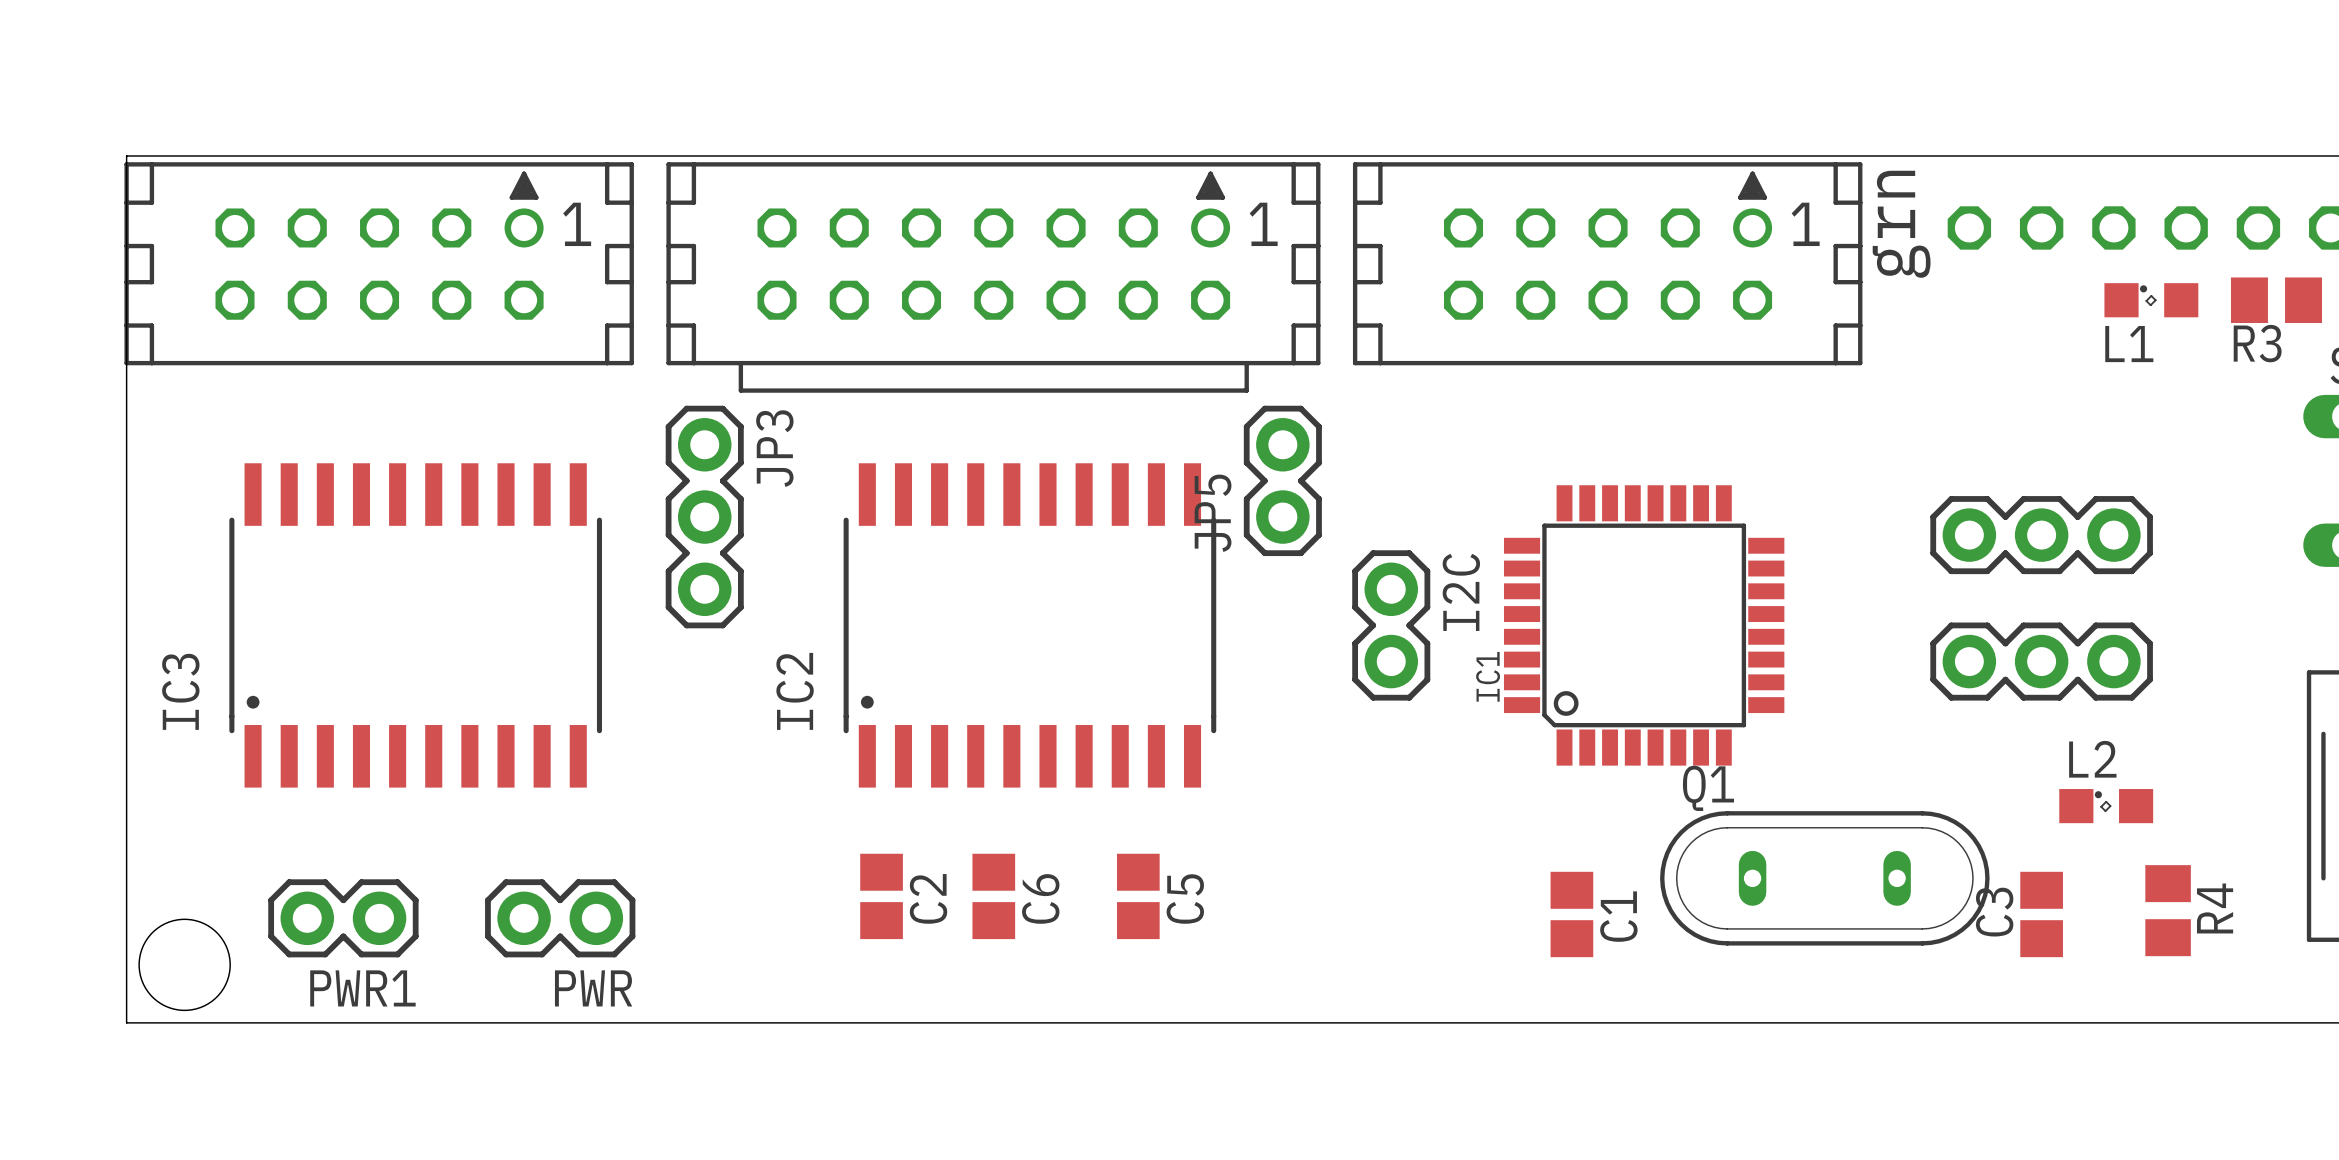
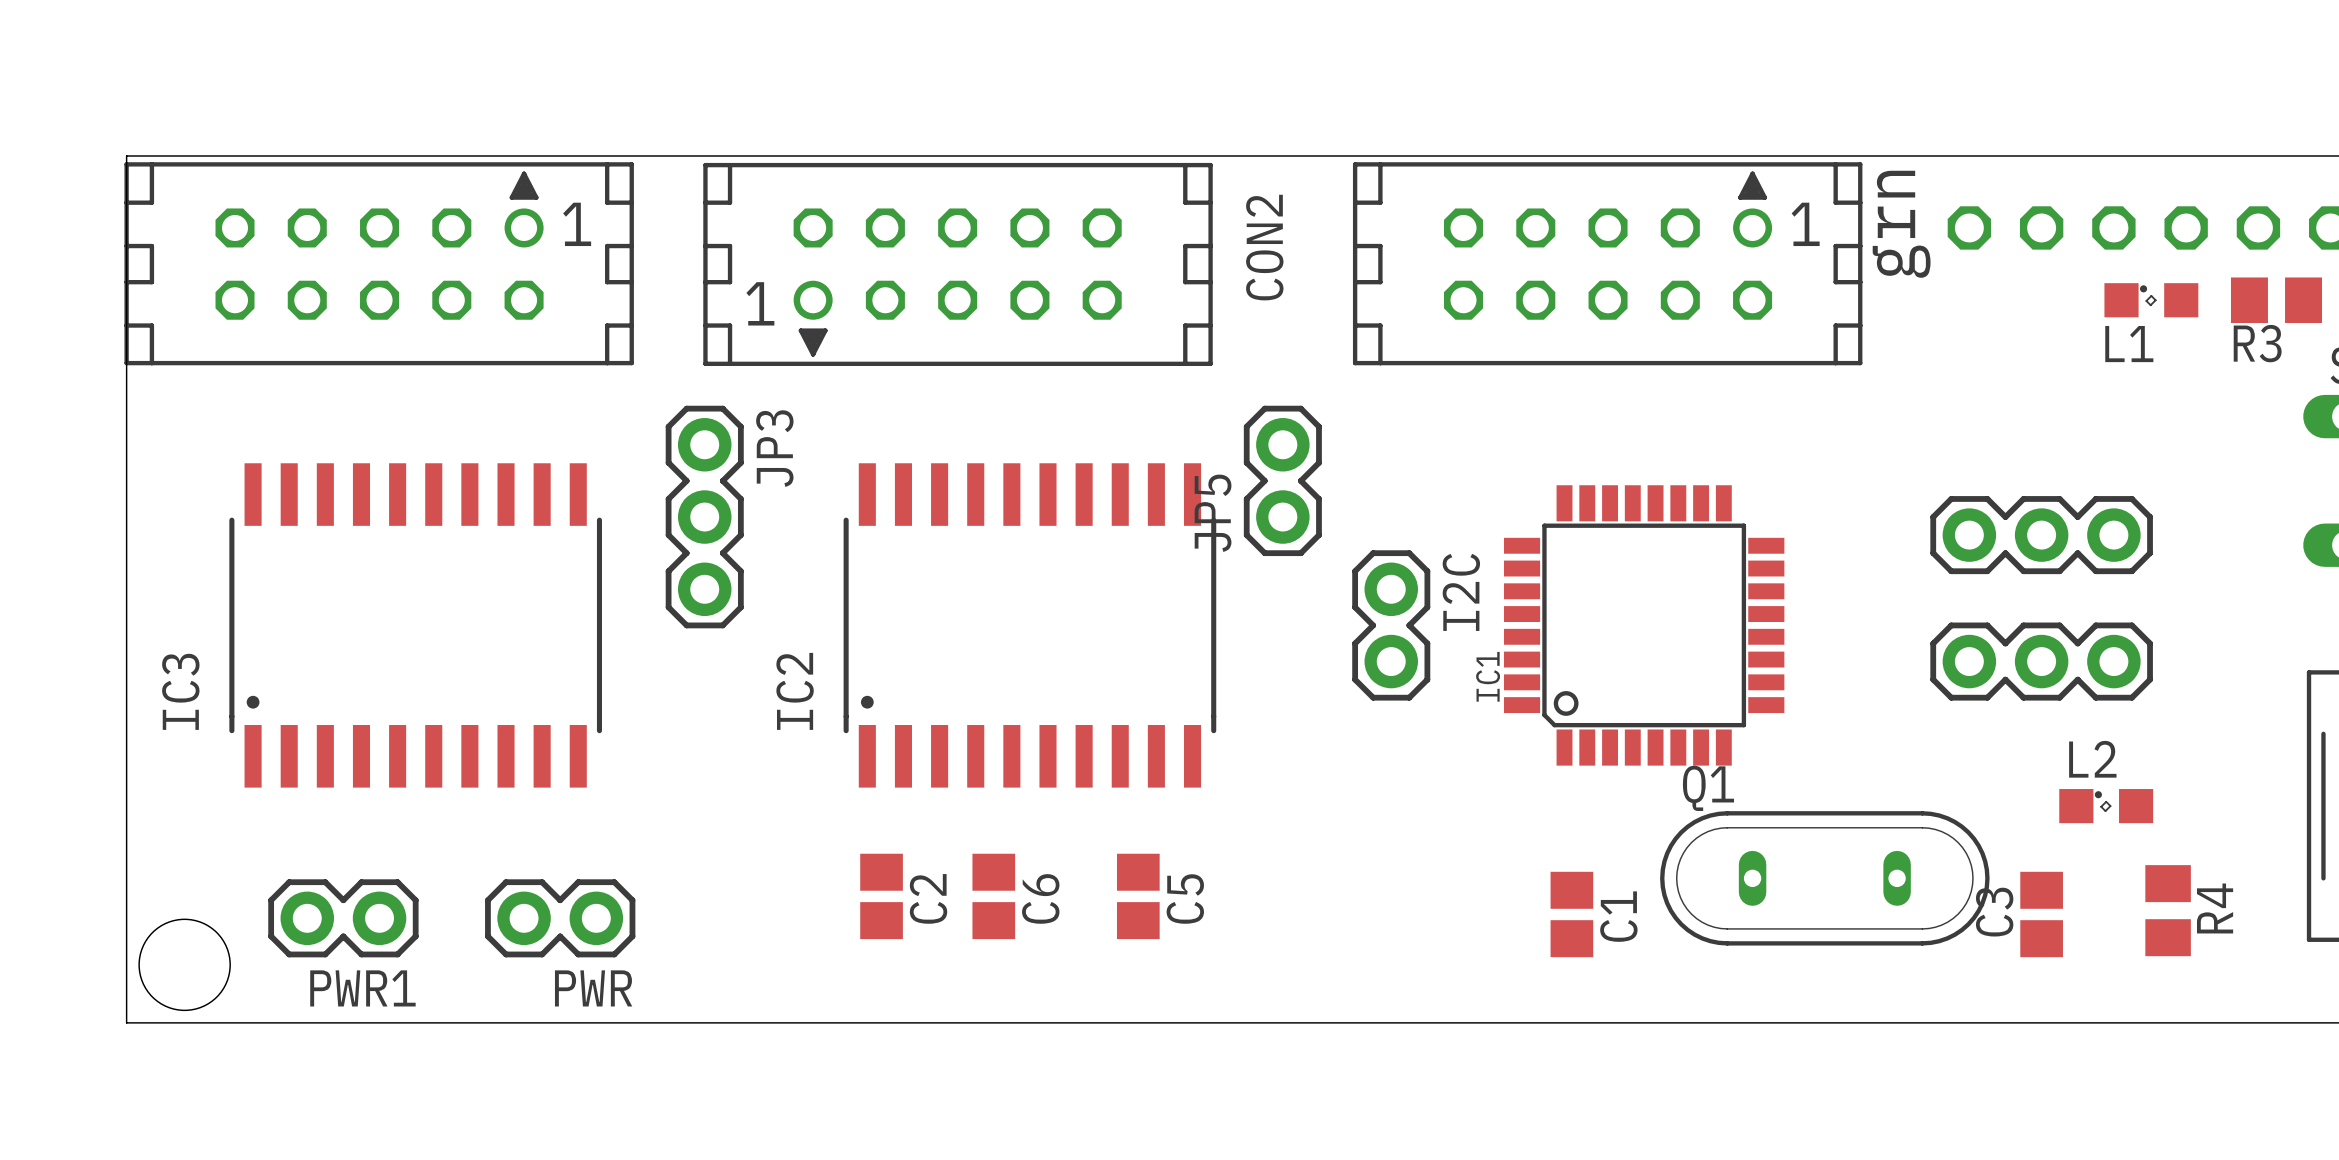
CON2: none -> (958, 264)
part: (993, 277) -> none

